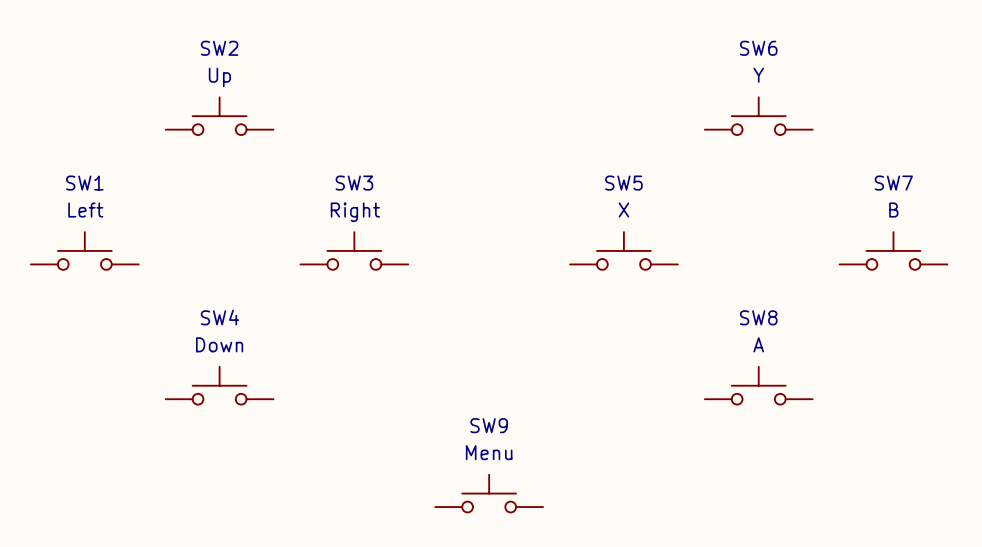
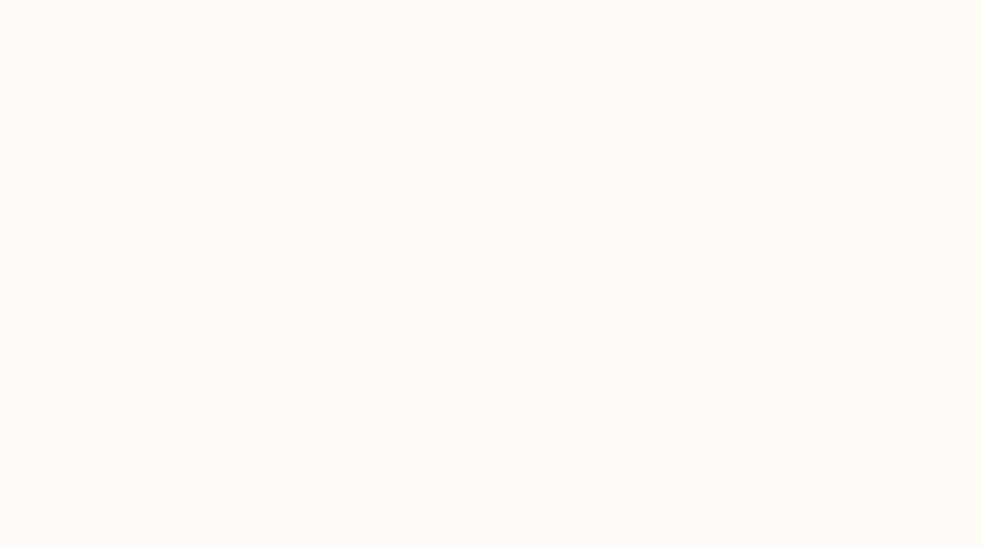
SW2: Up (219, 116) -> none
SW6: Y (758, 116) -> none
SW1: Left (84, 250) -> none
SW3: Right (354, 250) -> none
SW5: X (623, 250) -> none
SW7: B (893, 250) -> none
SW4: Down (219, 385) -> none
SW8: A (758, 385) -> none
SW9: Menu (489, 493) -> none

